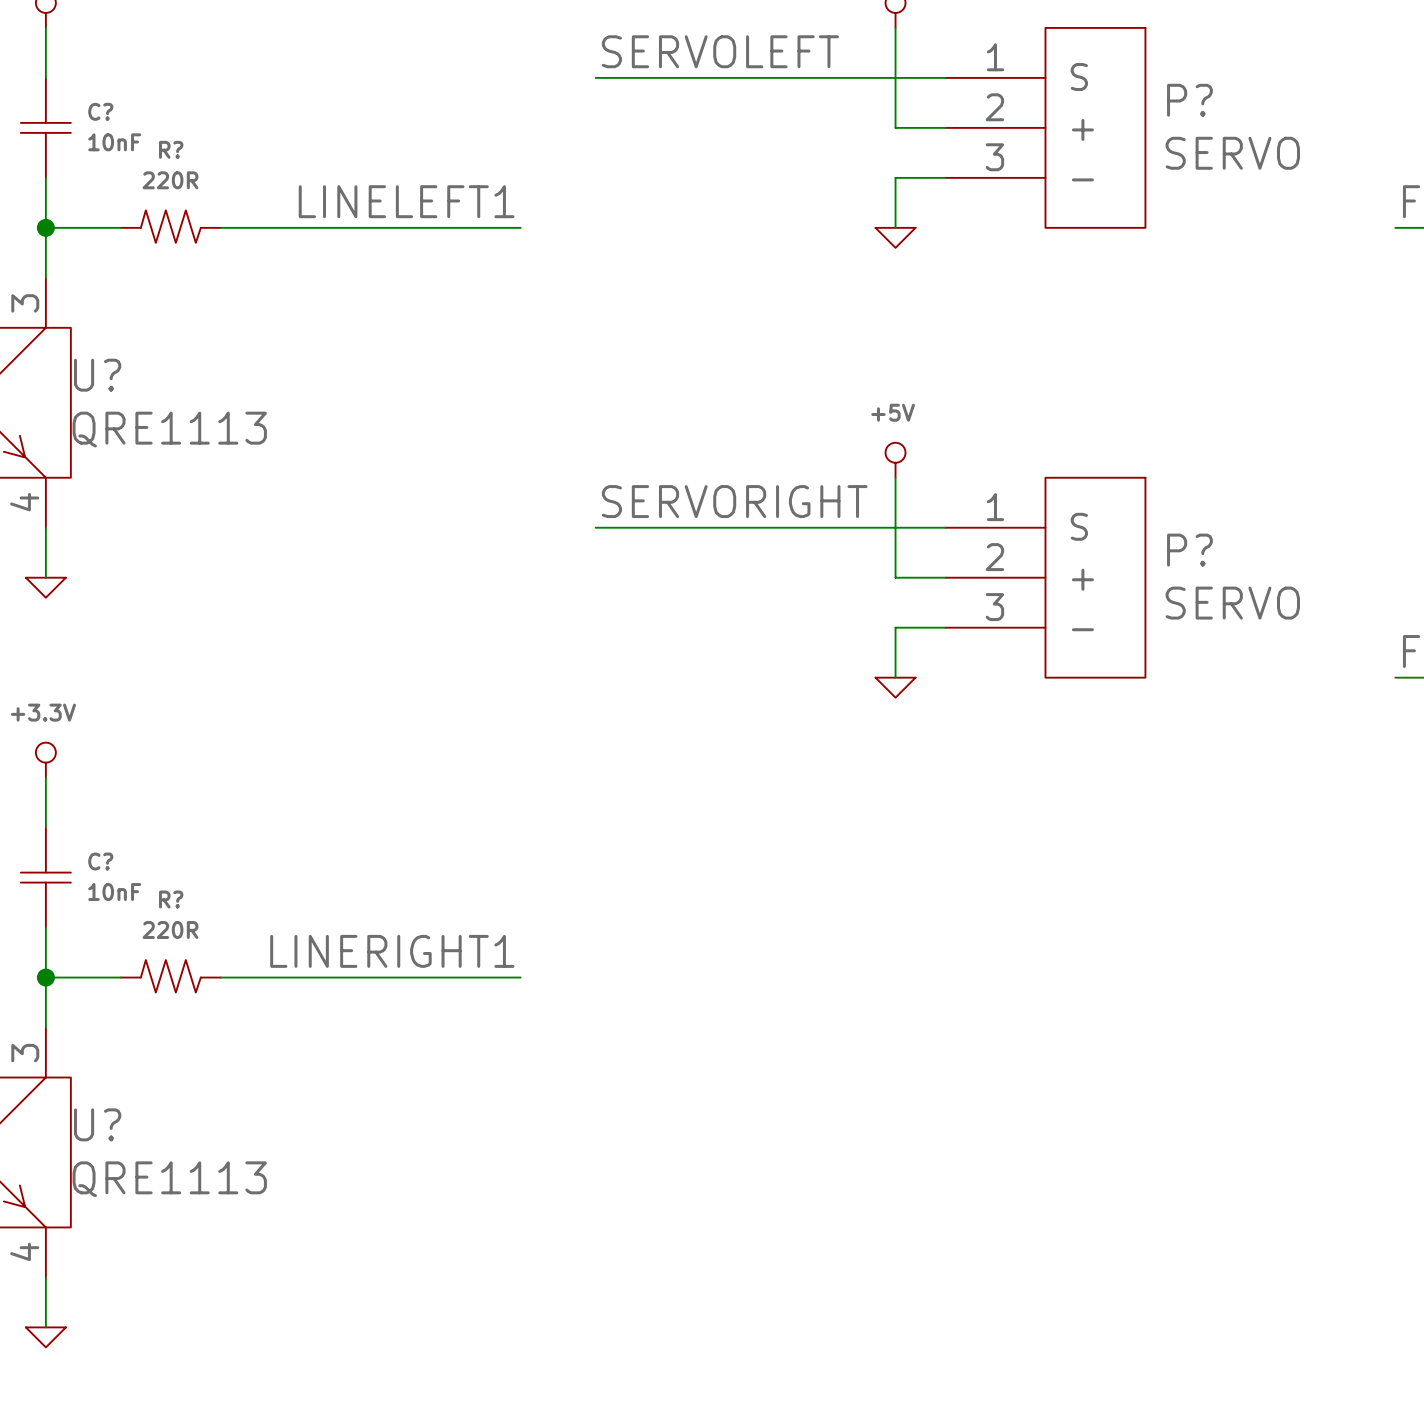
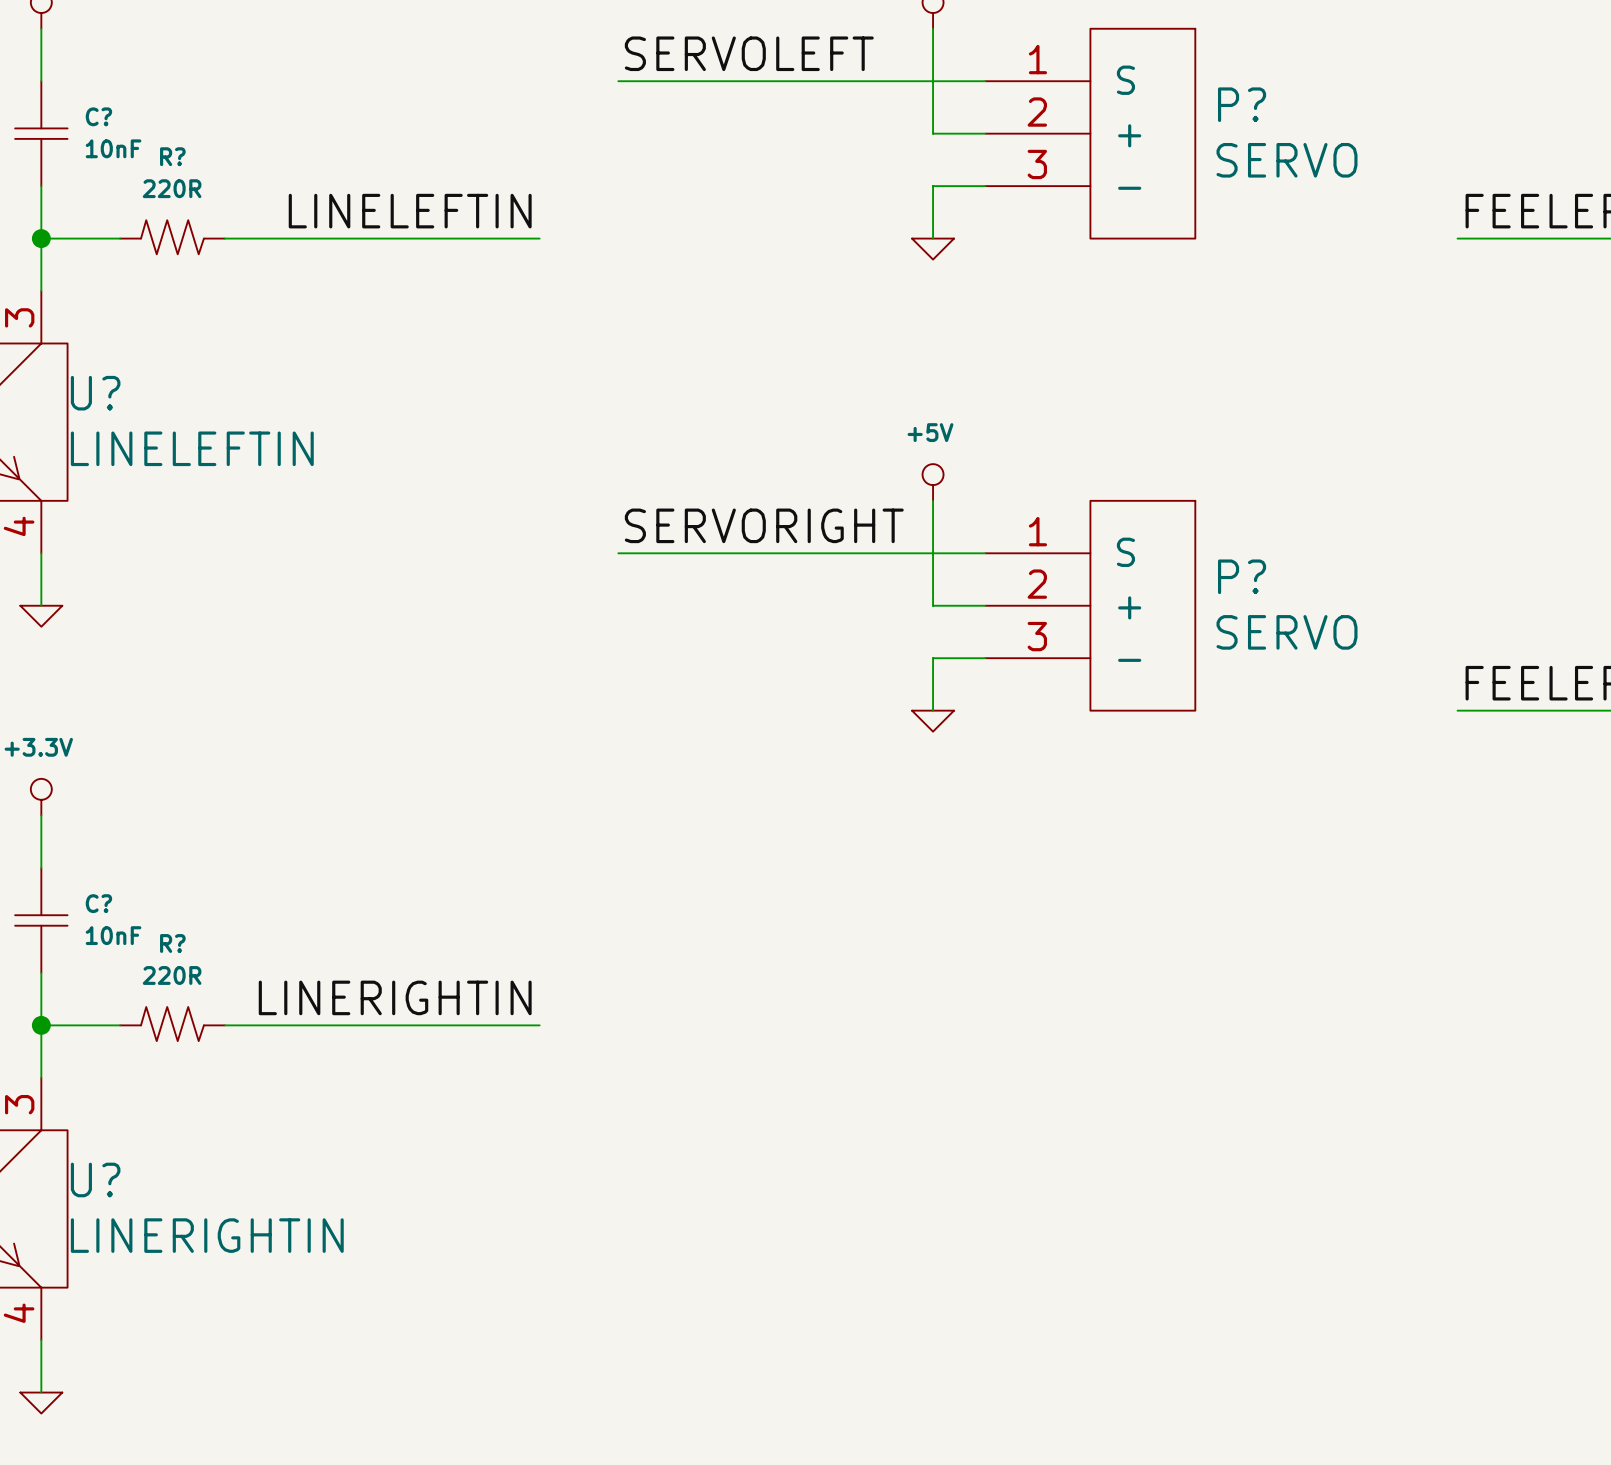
label: LINELEFT1 (406, 201) -> LINELEFTIN (410, 211)
U? value: QRE1113 (169, 429) -> LINELEFTIN (192, 448)
label: LINERIGHT1 (392, 951) -> LINERIGHTIN (395, 997)
U? value: QRE1113 (169, 1179) -> LINERIGHTIN (207, 1235)

